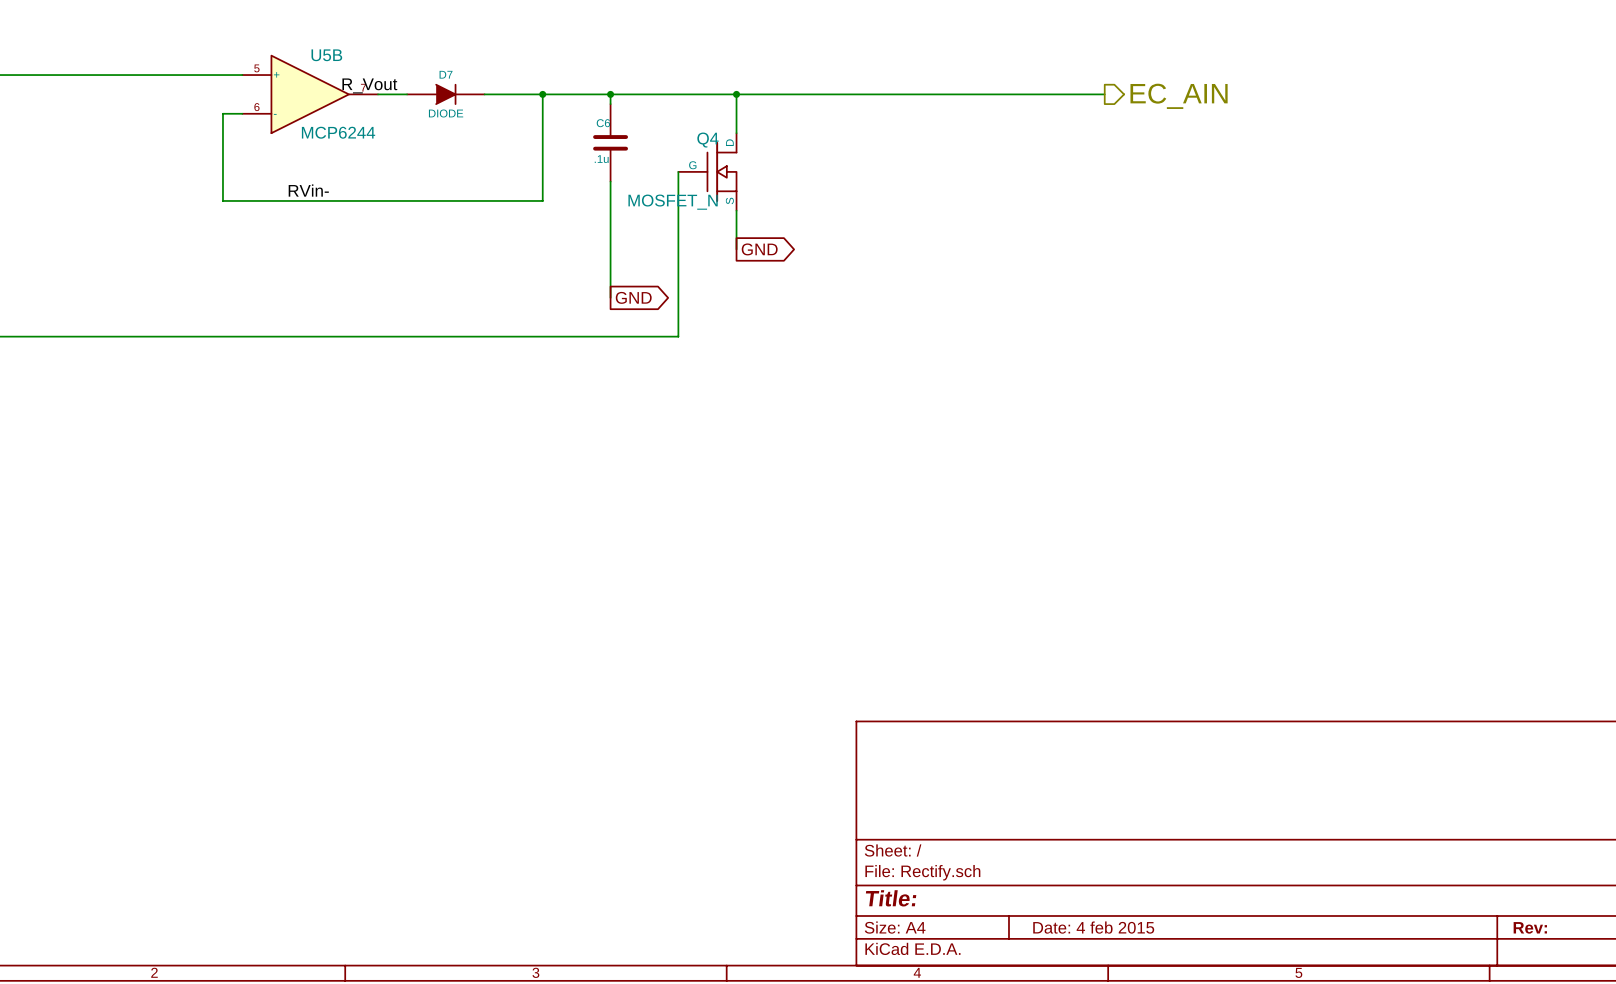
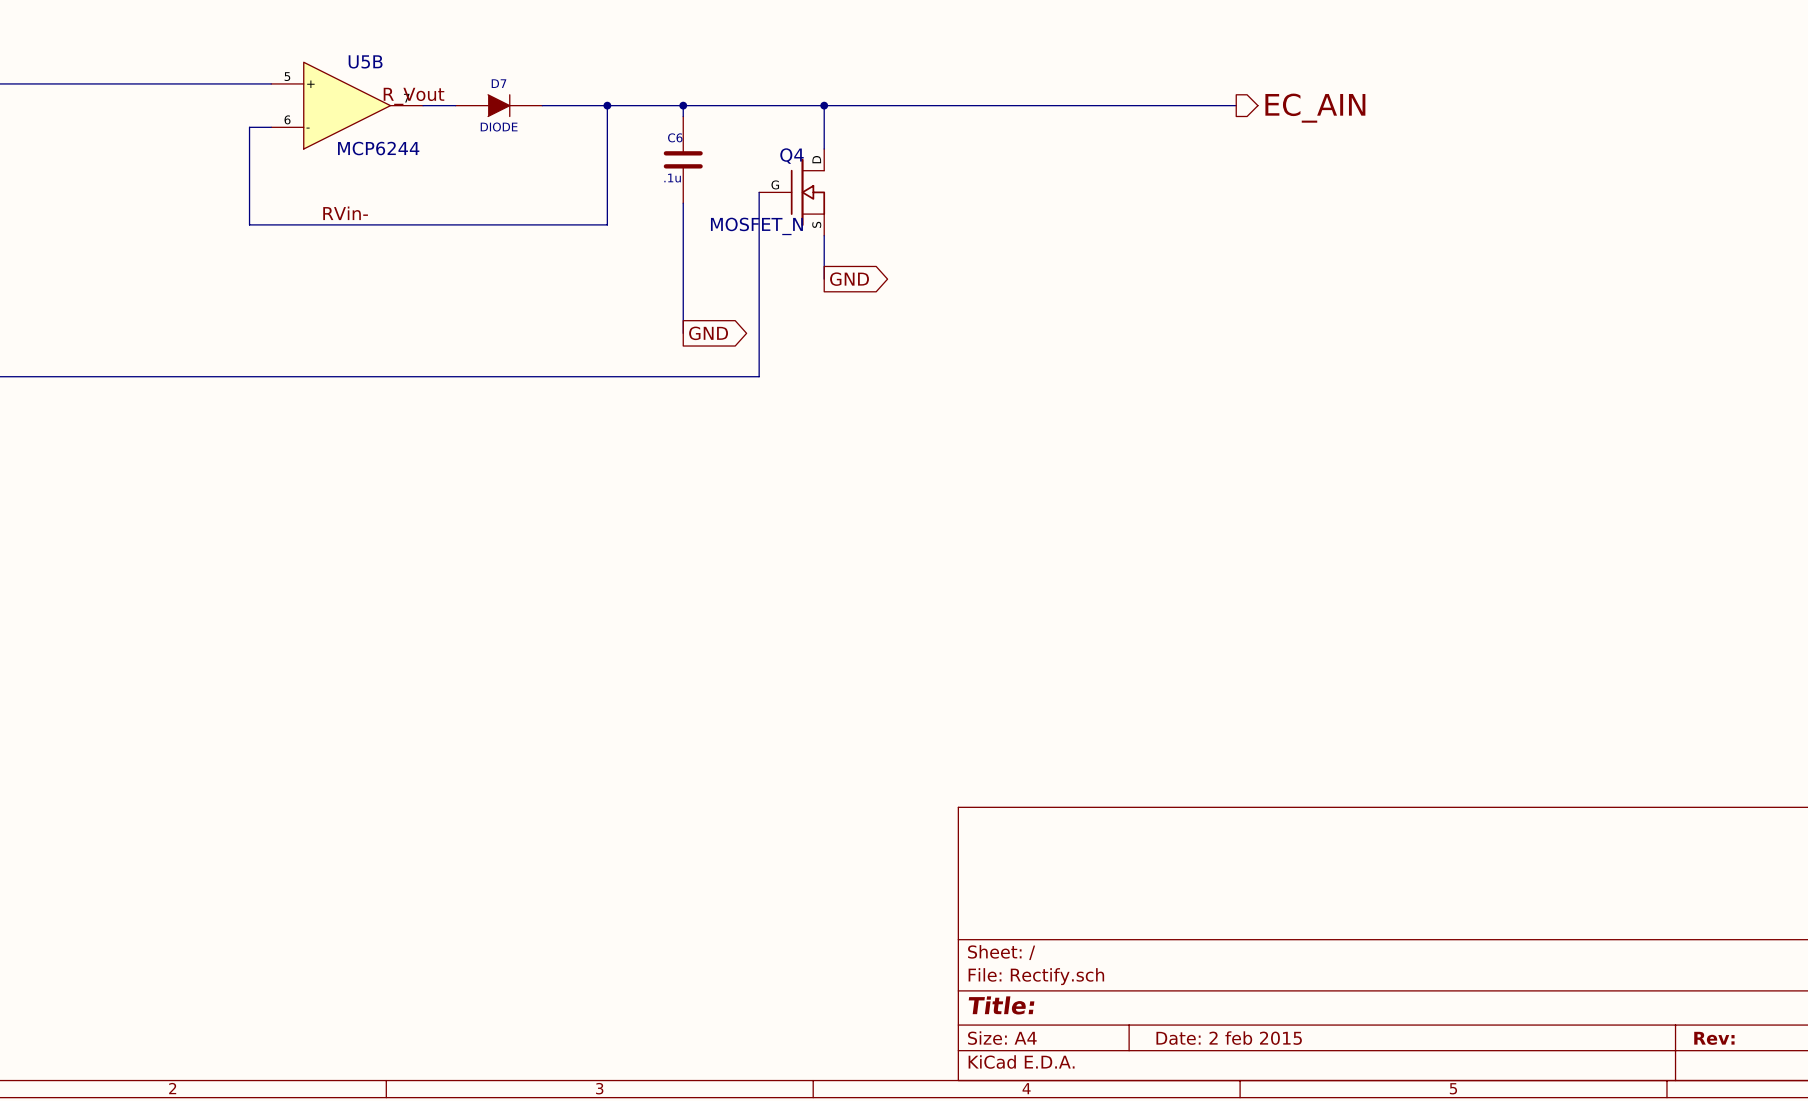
title block: Date: 4 feb 2015 (1093, 927) -> Date: 2 feb 2015 (1229, 1038)

